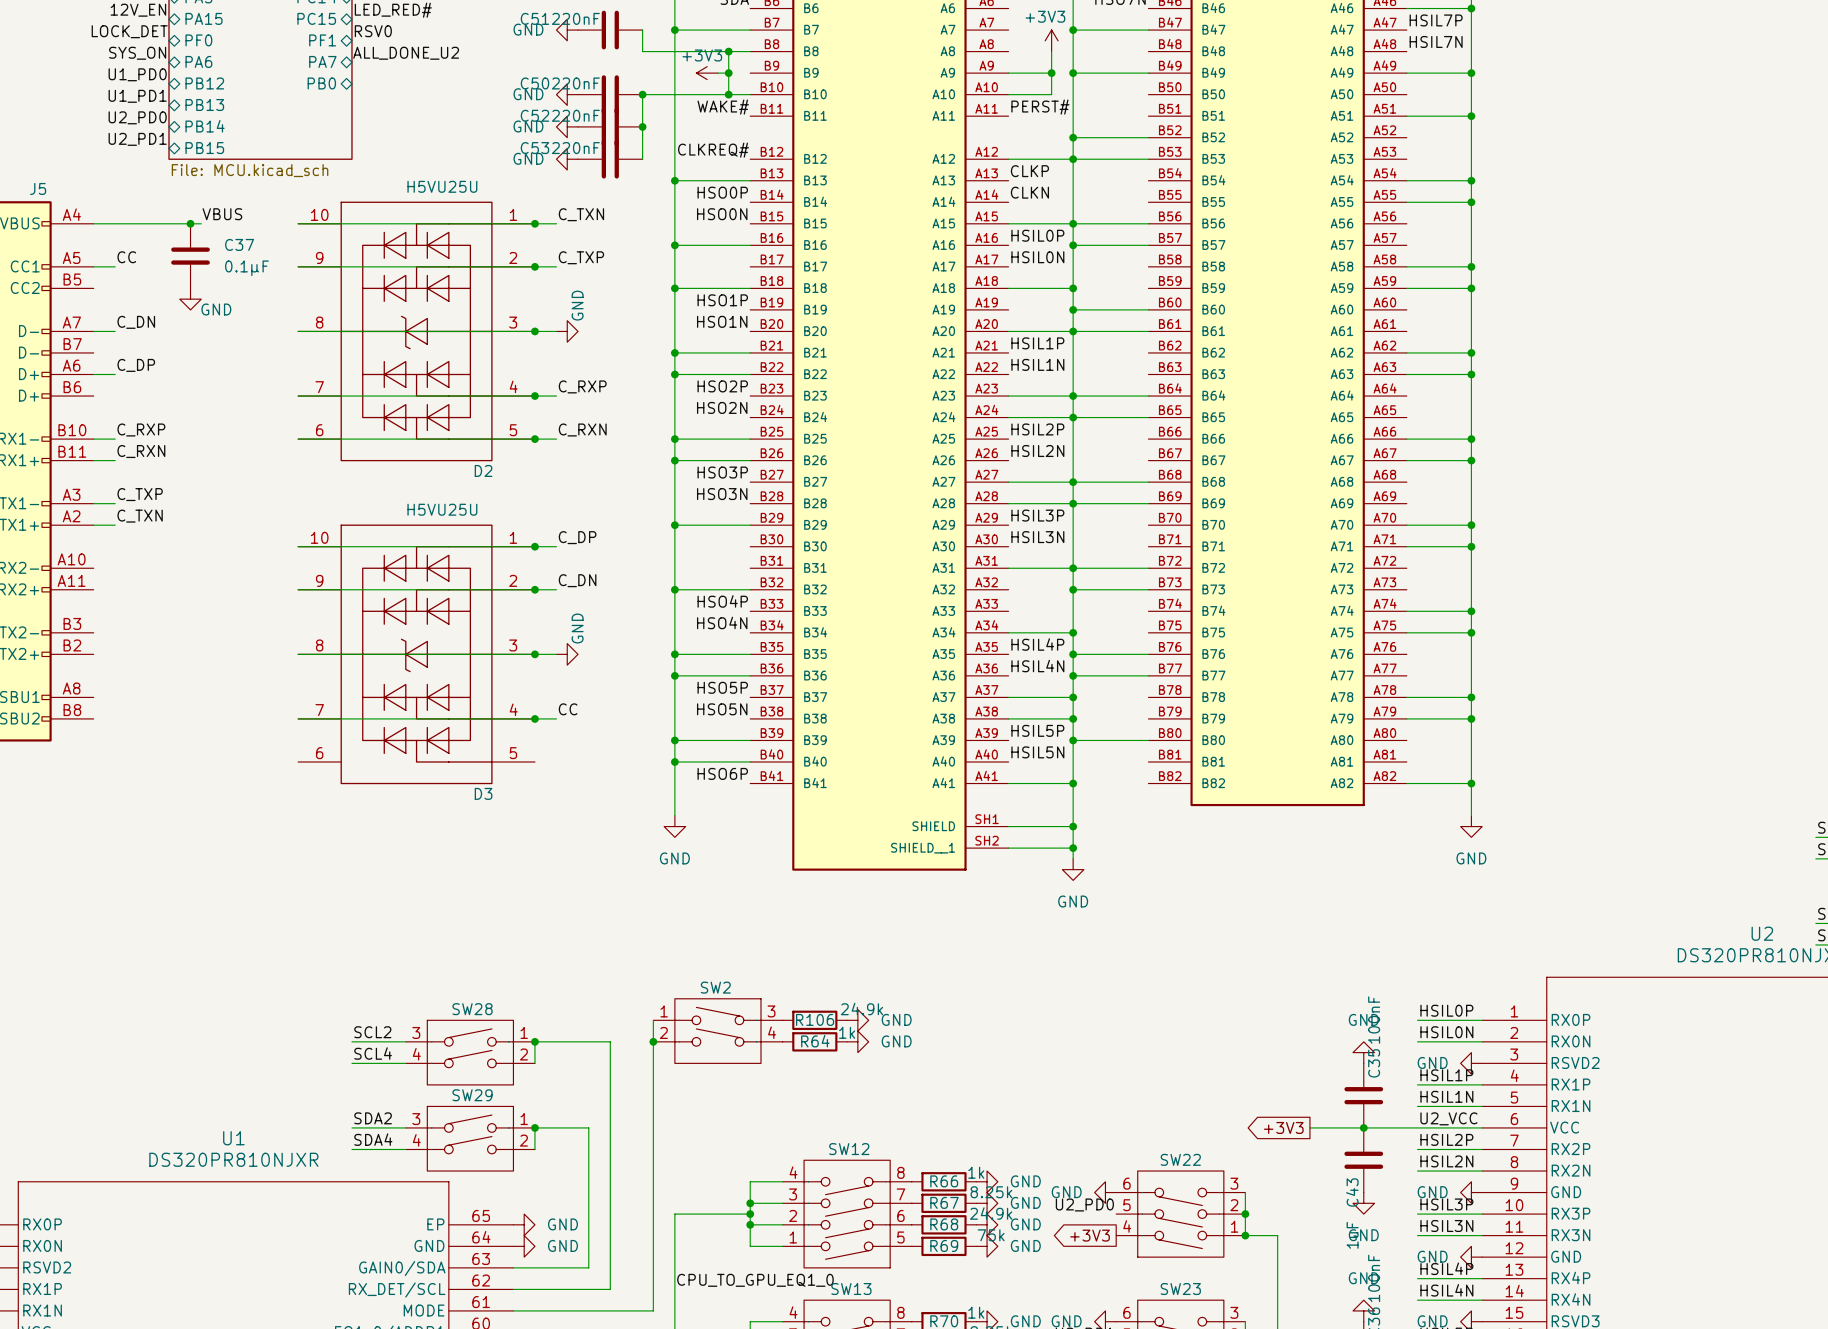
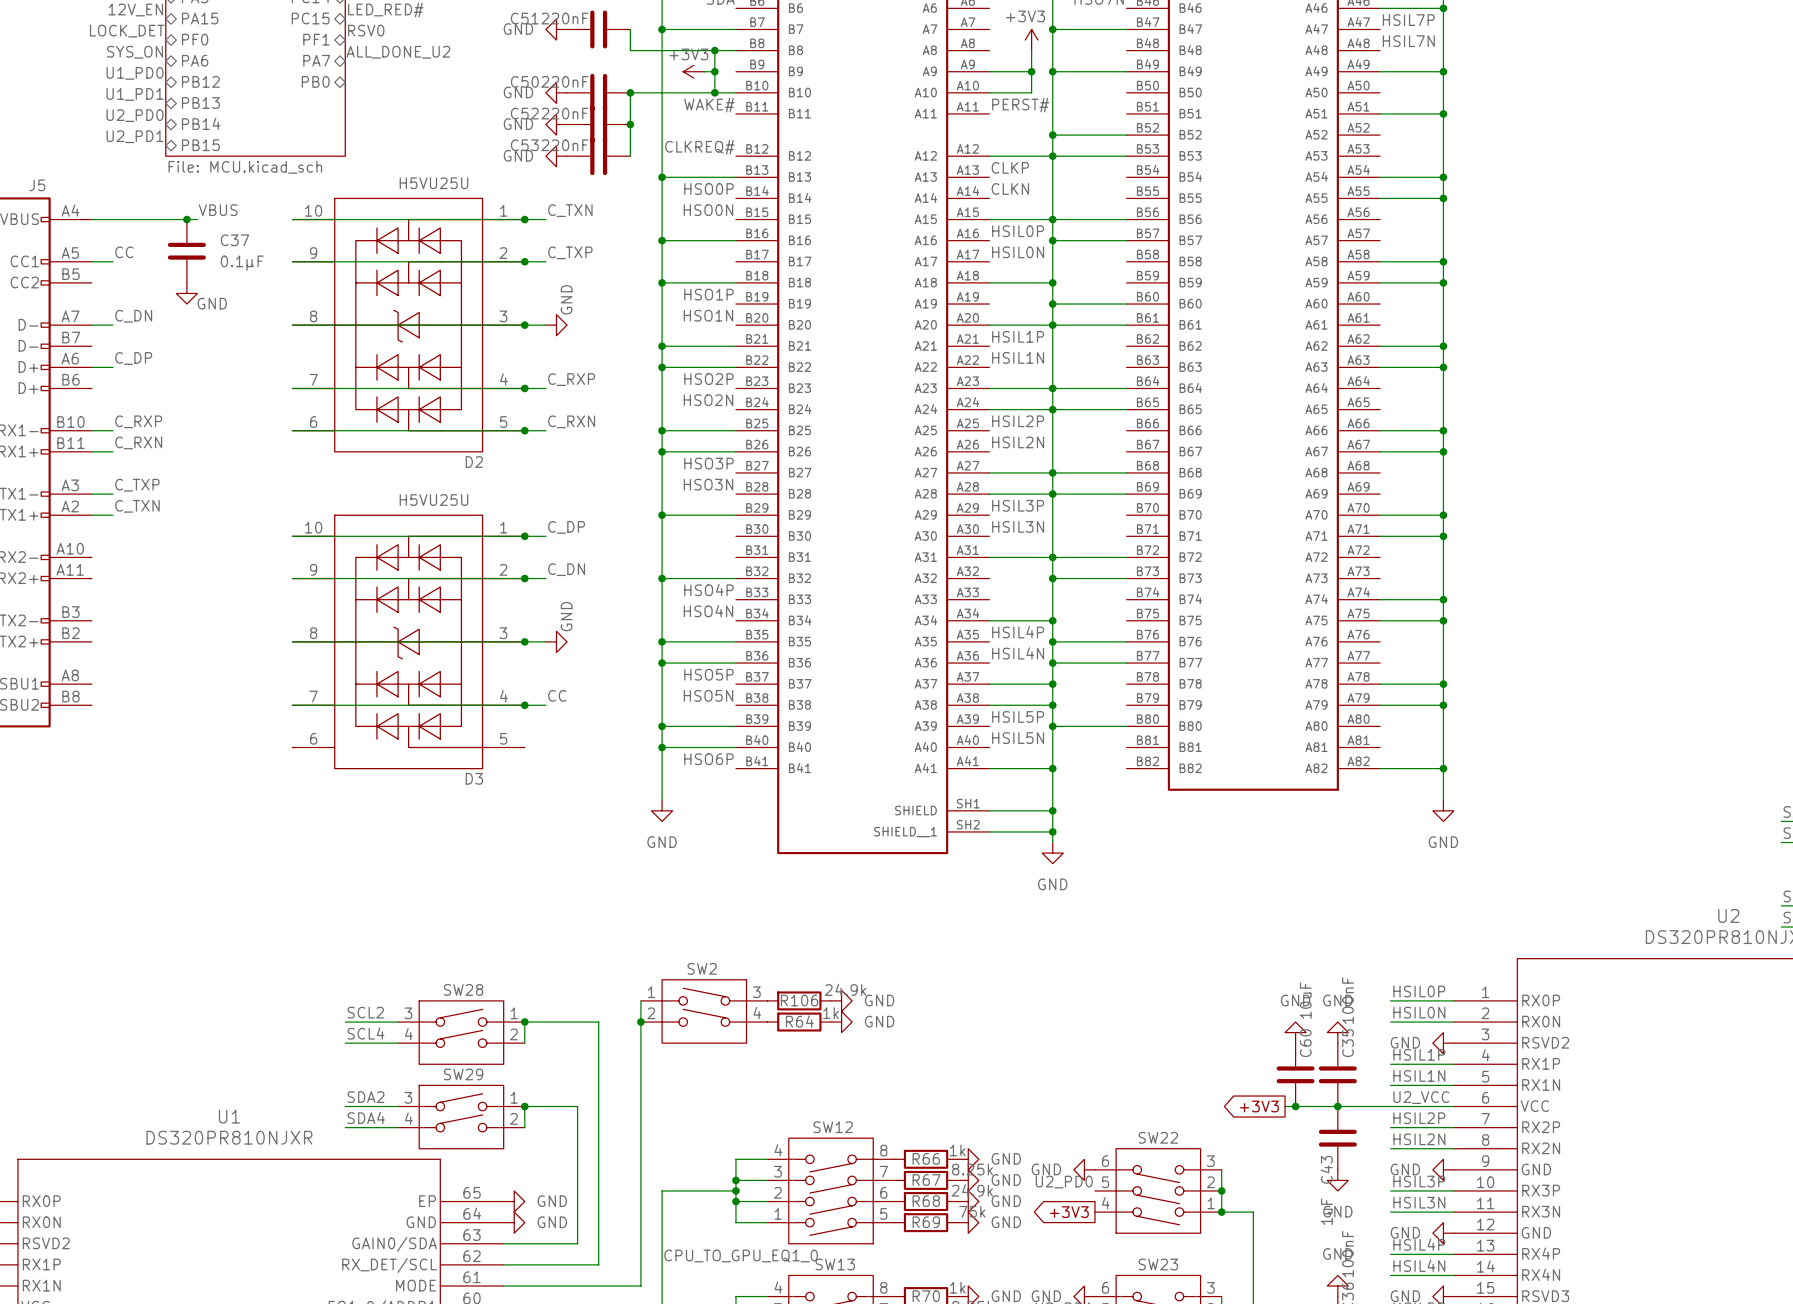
power symbol: none -> GND (1295, 1032)
C60: none -> 10uF (1295, 1074)
junction: none -> (1295, 1106)

